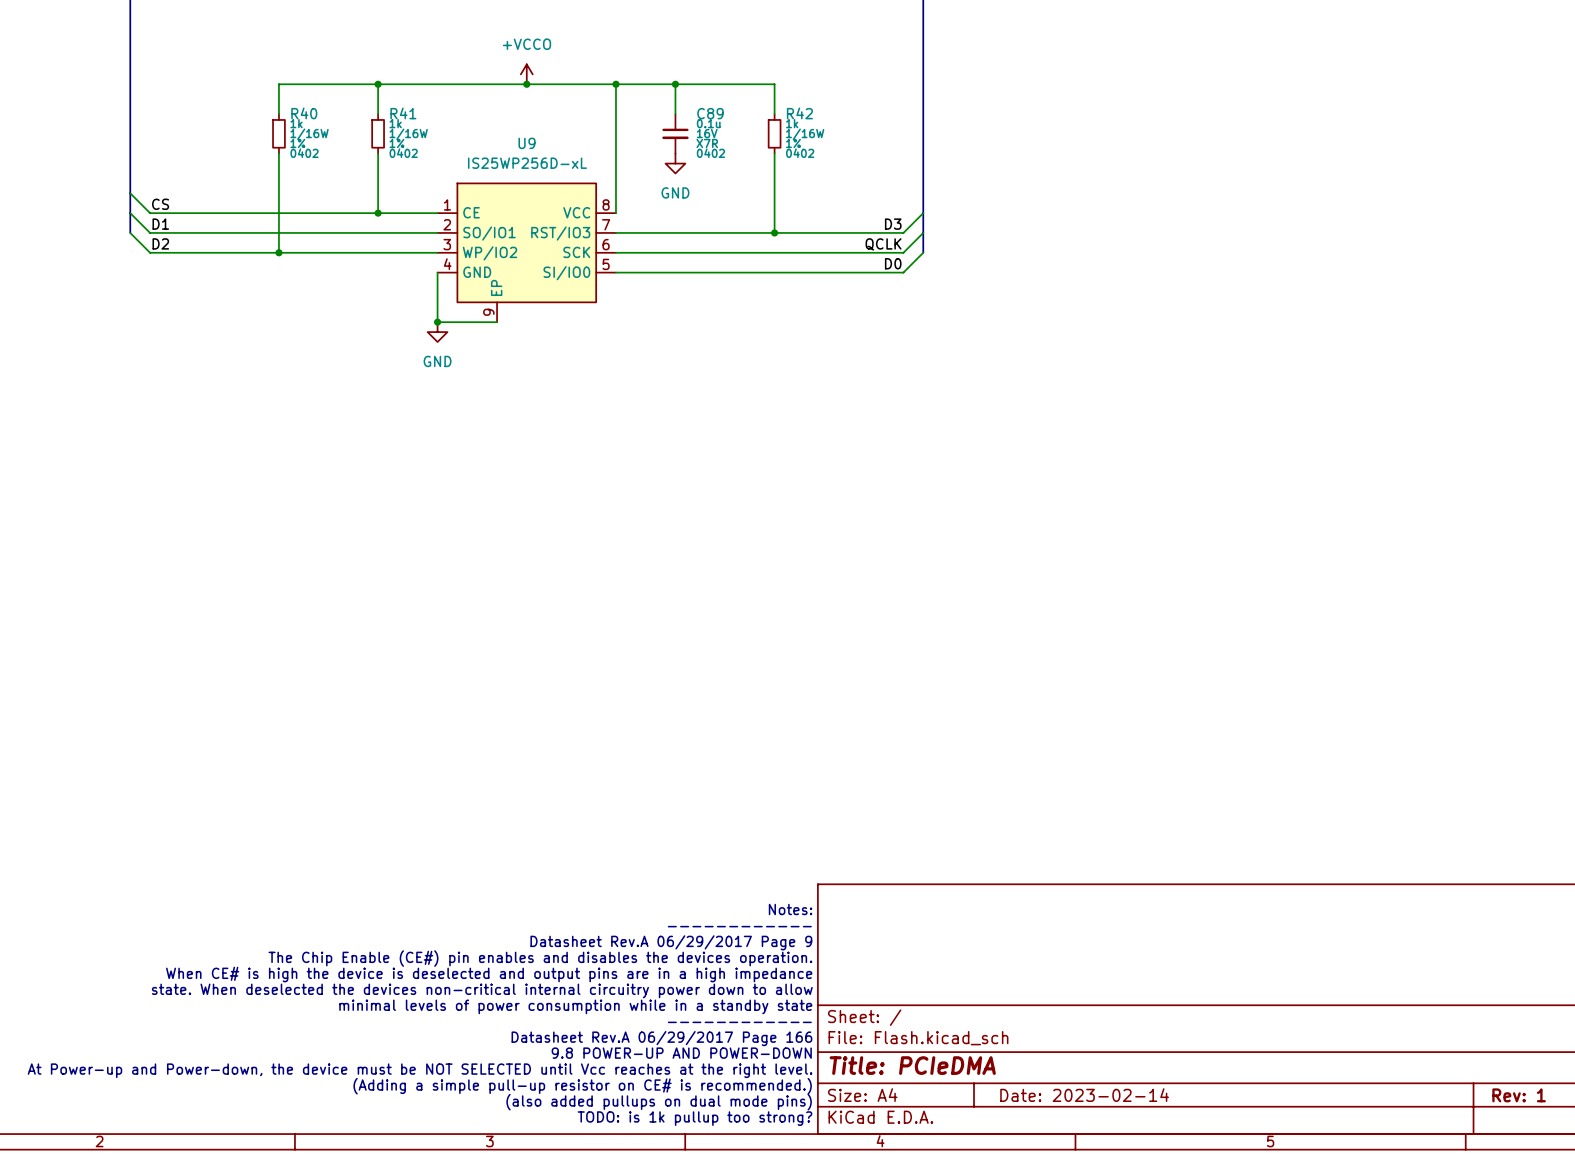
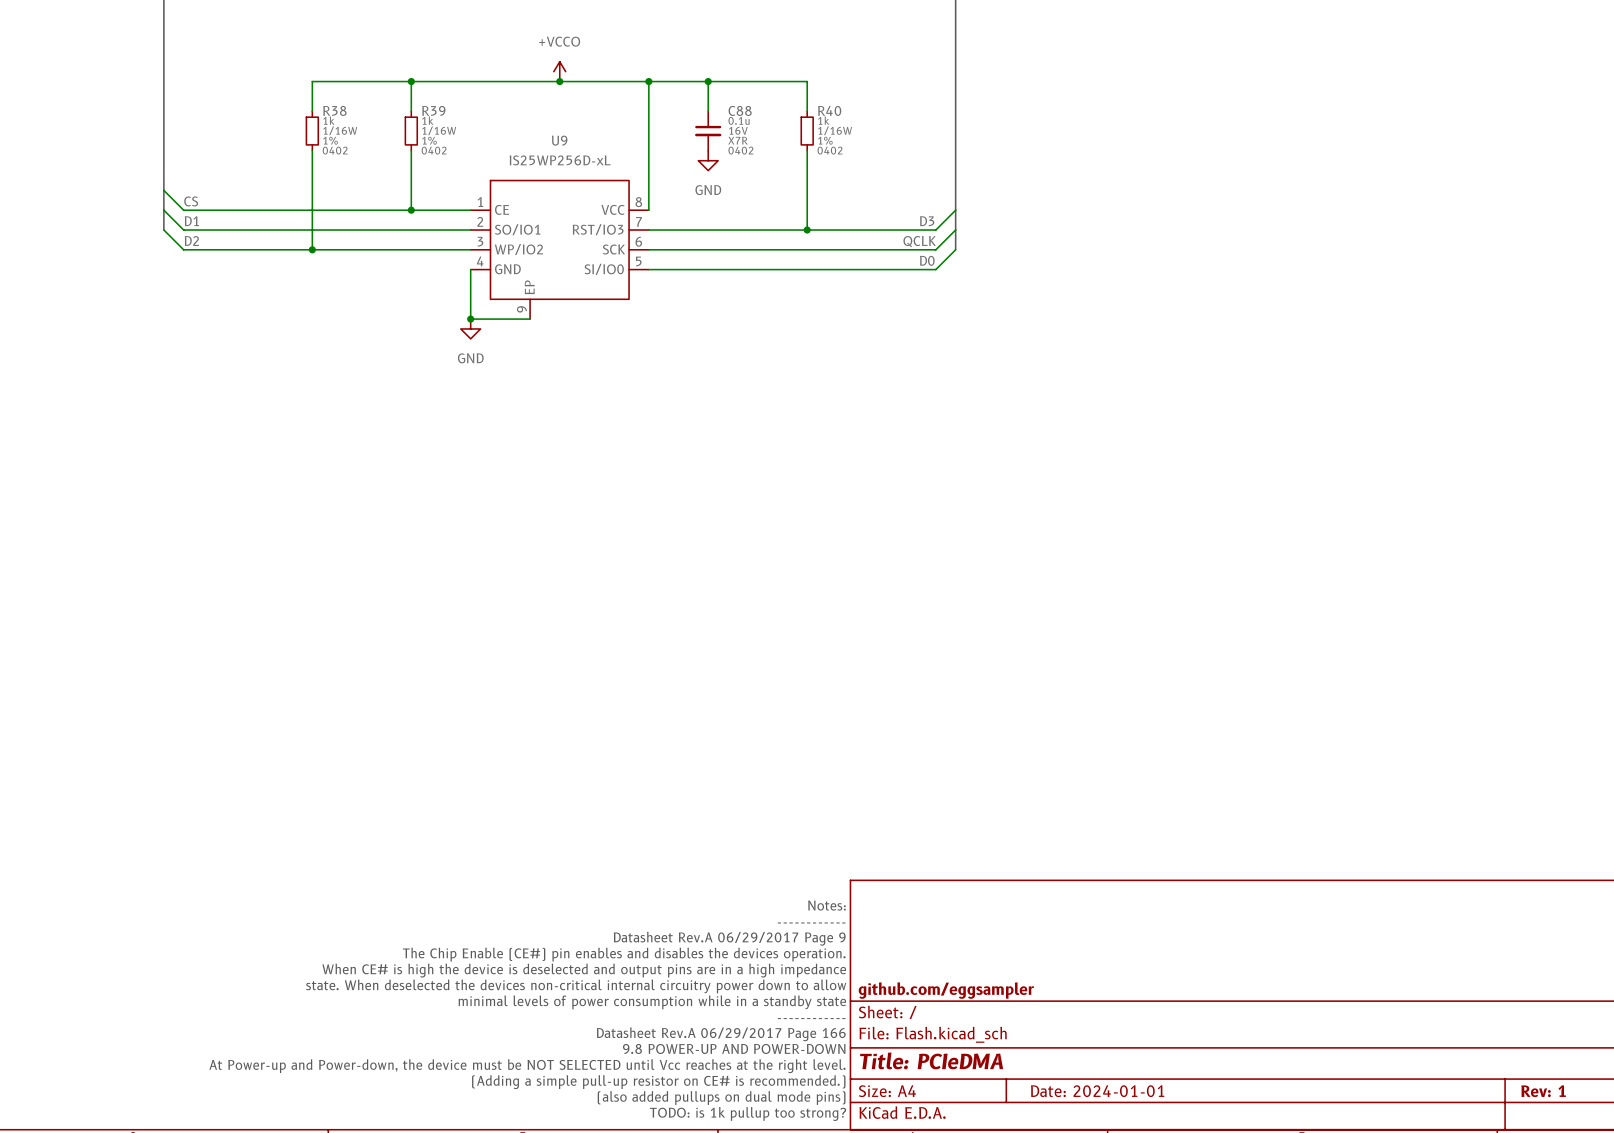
R40 name: R40 (304, 113) -> R38 (334, 110)
R41 name: R41 (403, 113) -> R39 (433, 110)
C89 name: C89 (710, 113) -> C88 (740, 110)
R42 name: R42 (799, 113) -> R40 (829, 110)
title block: none -> github.com/eggsampler (946, 990)
title block: Date: 2023-02-14 (1084, 1095) -> Date: 2024-01-01 (1097, 1091)

